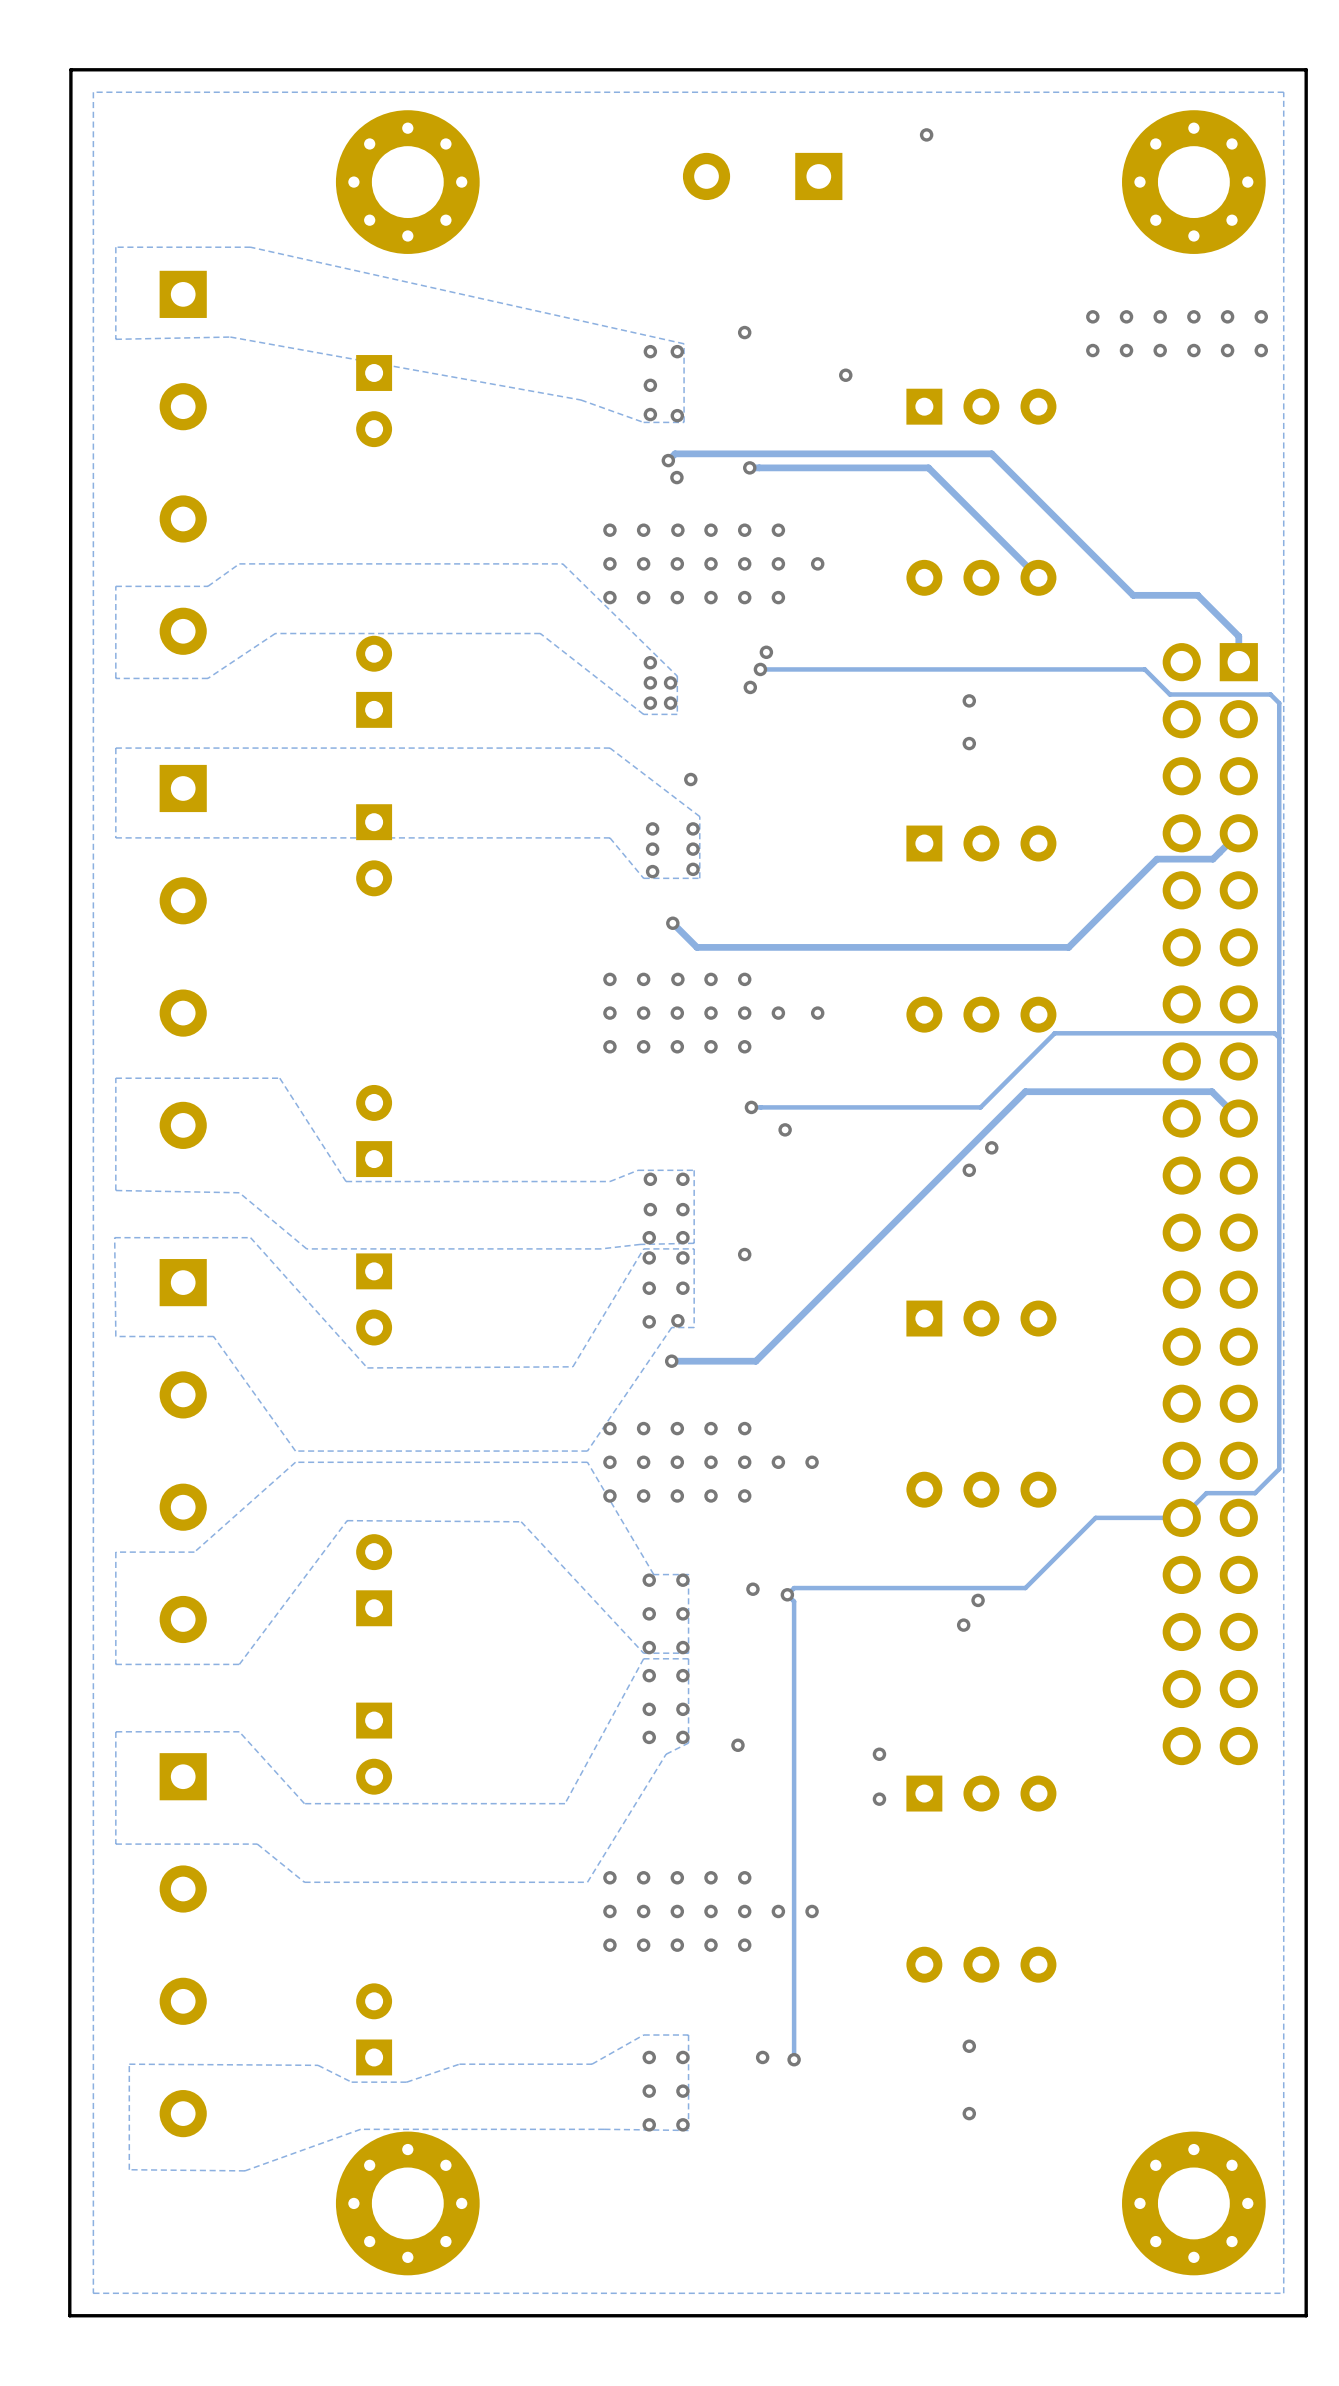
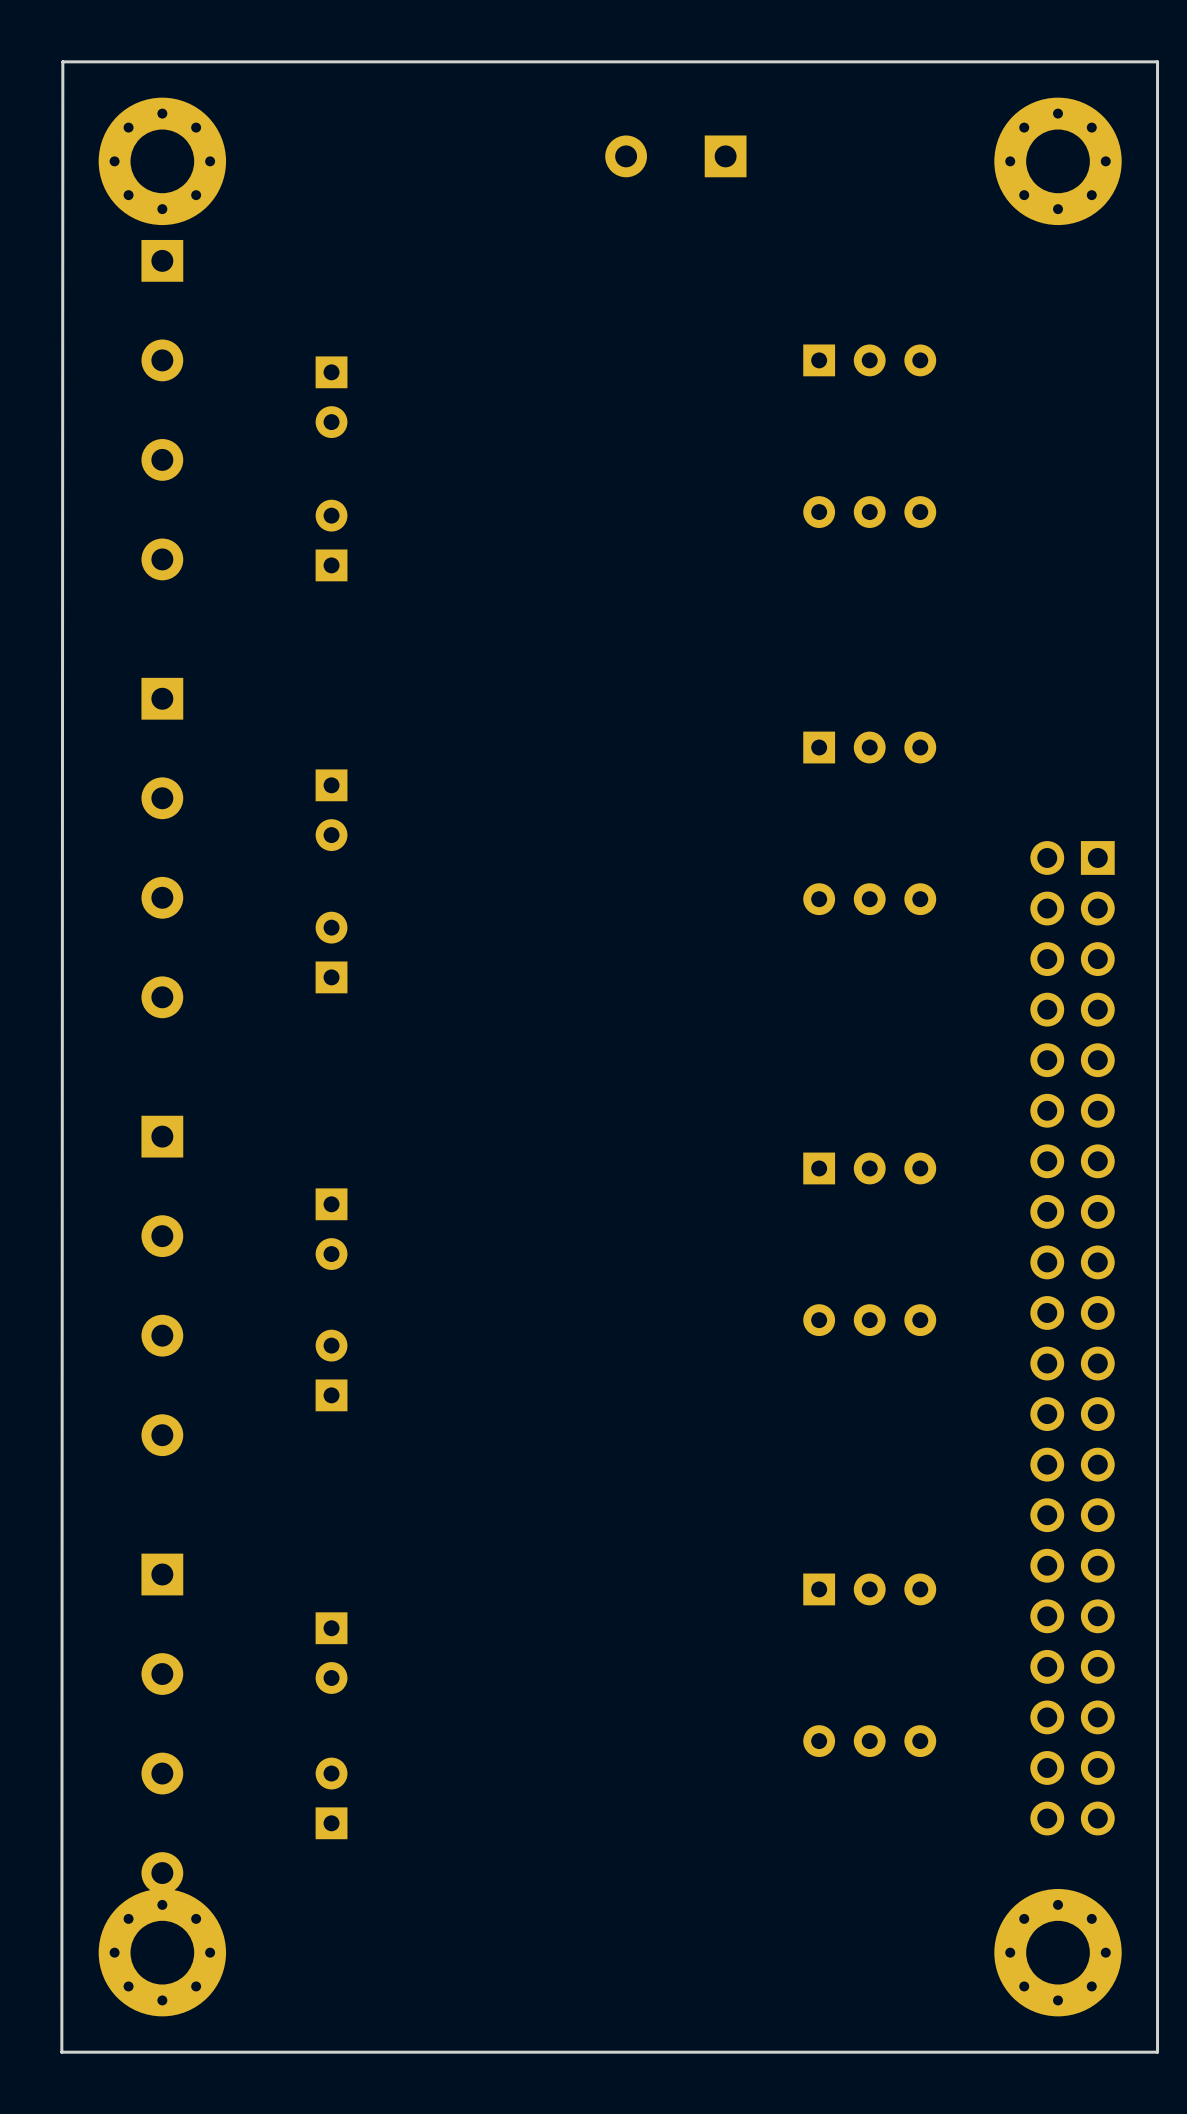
zone outline: (1283, 92) (93, 92) (93, 2293) (1283, 2293) (1283, 92) -> none
via: (926, 134) -> none
part position: (407, 182) -> (162, 161)
zone outline: (250, 247) (684, 343) (684, 422) (643, 422) (580, 399) (230, 337) (115, 339) (115, 247) (250, 247) -> none
via: (1092, 316) -> none
via: (1126, 316) -> none
via: (1160, 316) -> none
via: (1193, 316) -> none
via: (1227, 316) -> none
via: (1261, 316) -> none
via: (744, 332) -> none
via: (1092, 350) -> none
via: (1126, 350) -> none
via: (1160, 350) -> none
via: (1193, 350) -> none
via: (1227, 350) -> none
via: (1261, 350) -> none
via: (650, 351) -> none
via: (677, 351) -> none
via: (845, 375) -> none
via: (650, 385) -> none
part position: (374, 401) -> (331, 397)
via: (650, 414) -> none
via: (677, 415) -> none
track: (668, 460) (675, 453) (991, 453) (1133, 595) (1197, 595) (1238, 636) (1238, 662) -> none
via: (668, 460) -> none
track: (749, 467) (928, 467) (1038, 577) -> none
via: (749, 467) -> none
via: (676, 477) -> none
via: (609, 530) -> none
via: (643, 530) -> none
via: (677, 530) -> none
via: (711, 530) -> none
via: (744, 530) -> none
via: (778, 530) -> none
zone outline: (562, 563) (239, 563) (207, 586) (115, 586) (115, 678) (207, 678) (275, 633) (540, 633) (643, 714) (677, 714) (677, 676) (562, 563) -> none
via: (609, 563) -> none
via: (643, 563) -> none
via: (677, 563) -> none
via: (711, 563) -> none
via: (744, 563) -> none
via: (778, 563) -> none
via: (817, 563) -> none
via: (609, 597) -> none
via: (643, 597) -> none
via: (677, 597) -> none
via: (711, 597) -> none
via: (744, 597) -> none
via: (778, 597) -> none
via: (766, 652) -> none
via: (650, 662) -> none
track: (760, 669) (1144, 669) (1169, 694) (1270, 694) (1279, 703) (1279, 1469) (1255, 1493) (1206, 1493) (1181, 1517) (1095, 1517) (1025, 1588) (794, 1588) (787, 1594) (794, 1601) (794, 2059) -> none
via: (760, 669) -> none
part position: (374, 681) -> (331, 540)
via: (650, 682) -> none
via: (670, 682) -> none
via: (750, 687) -> none
via: (969, 700) -> none
via: (650, 703) -> none
via: (670, 703) -> none
via: (969, 743) -> none
zone outline: (609, 748) (699, 816) (699, 878) (643, 878) (609, 837) (115, 837) (115, 748) (609, 748) -> none
via: (690, 779) -> none
via: (652, 828) -> none
via: (693, 828) -> none
track: (1238, 833) (1212, 859) (1156, 859) (1068, 947) (696, 947) (672, 923) -> none
via: (652, 849) -> none
via: (693, 849) -> none
part position: (374, 850) -> (331, 810)
via: (693, 869) -> none
via: (652, 871) -> none
via: (672, 923) -> none
via: (609, 979) -> none
via: (643, 979) -> none
via: (677, 979) -> none
via: (711, 979) -> none
via: (744, 979) -> none
via: (609, 1013) -> none
via: (643, 1013) -> none
via: (677, 1013) -> none
via: (711, 1013) -> none
via: (744, 1013) -> none
via: (778, 1013) -> none
via: (817, 1013) -> none
track: (1279, 1037) (1274, 1033) (1054, 1033) (980, 1107) (751, 1107) -> none
via: (609, 1046) -> none
via: (643, 1046) -> none
via: (677, 1046) -> none
via: (711, 1046) -> none
via: (744, 1046) -> none
zone outline: (279, 1078) (115, 1078) (115, 1190) (239, 1192) (306, 1248) (600, 1248) (640, 1244) (694, 1243) (694, 1170) (638, 1170) (609, 1181) (346, 1181) (279, 1078) -> none
via: (751, 1107) -> none
track: (1238, 1118) (1211, 1091) (1025, 1091) (755, 1361) (671, 1361) -> none
via: (785, 1129) -> none
part position: (374, 1131) -> (331, 952)
via: (991, 1147) -> none
via: (969, 1170) -> none
via: (650, 1179) -> none
via: (682, 1179) -> none
part position: (1210, 1204) -> (1072, 1338)
via: (650, 1209) -> none
via: (682, 1209) -> none
zone outline: (250, 1237) (114, 1237) (115, 1336) (213, 1336) (295, 1451) (587, 1451) (671, 1327) (694, 1327) (694, 1248) (643, 1248) (572, 1366) (367, 1367) (250, 1237) -> none
via: (649, 1237) -> none
via: (682, 1237) -> none
via: (744, 1254) -> none
via: (649, 1257) -> none
via: (682, 1257) -> none
via: (649, 1288) -> none
via: (682, 1288) -> none
part position: (374, 1299) -> (331, 1229)
via: (677, 1320) -> none
via: (649, 1321) -> none
via: (671, 1361) -> none
via: (609, 1428) -> none
via: (643, 1428) -> none
via: (677, 1428) -> none
via: (711, 1428) -> none
via: (744, 1428) -> none
zone outline: (587, 1462) (653, 1574) (688, 1574) (688, 1653) (643, 1653) (521, 1521) (347, 1520) (239, 1664) (115, 1664) (115, 1552) (194, 1552) (295, 1462) (587, 1462) -> none
via: (609, 1462) -> none
via: (643, 1462) -> none
via: (677, 1462) -> none
via: (711, 1462) -> none
via: (744, 1462) -> none
via: (778, 1462) -> none
via: (812, 1462) -> none
via: (609, 1495) -> none
via: (643, 1495) -> none
via: (677, 1495) -> none
via: (711, 1495) -> none
via: (744, 1495) -> none
part position: (374, 1580) -> (331, 1370)
via: (649, 1580) -> none
via: (682, 1580) -> none
via: (752, 1589) -> none
via: (787, 1594) -> none
via: (978, 1600) -> none
via: (649, 1613) -> none
via: (682, 1613) -> none
via: (963, 1625) -> none
via: (649, 1647) -> none
via: (682, 1647) -> none
zone outline: (688, 1658) (688, 1743) (666, 1754) (587, 1882) (304, 1882) (257, 1844) (115, 1844) (115, 1731) (239, 1731) (304, 1803) (565, 1803) (643, 1658) (688, 1658) -> none
via: (649, 1675) -> none
via: (682, 1675) -> none
via: (649, 1709) -> none
via: (682, 1709) -> none
via: (649, 1737) -> none
via: (682, 1737) -> none
via: (737, 1745) -> none
part: (374, 1748) -> none
via: (879, 1754) -> none
via: (879, 1799) -> none
part: none -> (331, 1653)
via: (609, 1877) -> none
via: (643, 1877) -> none
via: (677, 1877) -> none
via: (711, 1877) -> none
via: (744, 1877) -> none
via: (609, 1911) -> none
via: (643, 1911) -> none
via: (677, 1911) -> none
via: (711, 1911) -> none
via: (744, 1911) -> none
via: (778, 1911) -> none
via: (812, 1911) -> none
via: (609, 1945) -> none
via: (643, 1945) -> none
via: (677, 1945) -> none
via: (711, 1945) -> none
via: (744, 1945) -> none
zone outline: (688, 2035) (688, 2130) (360, 2129) (244, 2170) (129, 2169) (129, 2064) (317, 2065) (351, 2082) (406, 2082) (459, 2064) (591, 2064) (643, 2035) (688, 2035) -> none
via: (969, 2046) -> none
via: (649, 2057) -> none
via: (682, 2057) -> none
via: (762, 2057) -> none
via: (794, 2059) -> none
via: (649, 2091) -> none
via: (682, 2091) -> none
via: (969, 2113) -> none
via: (649, 2124) -> none
via: (682, 2124) -> none
part position: (407, 2203) -> (162, 1952)

